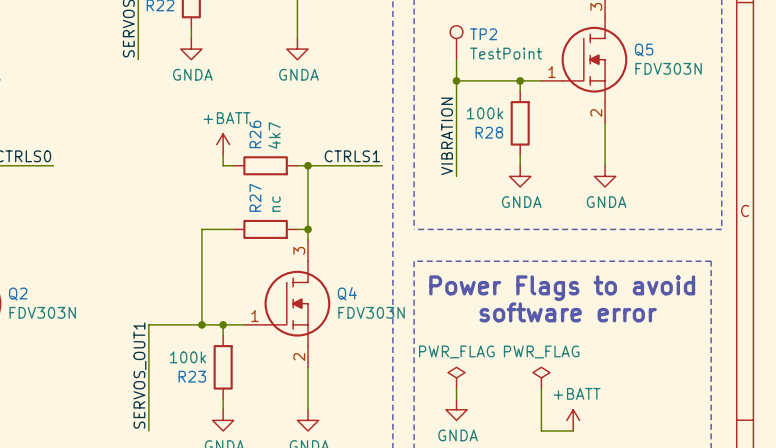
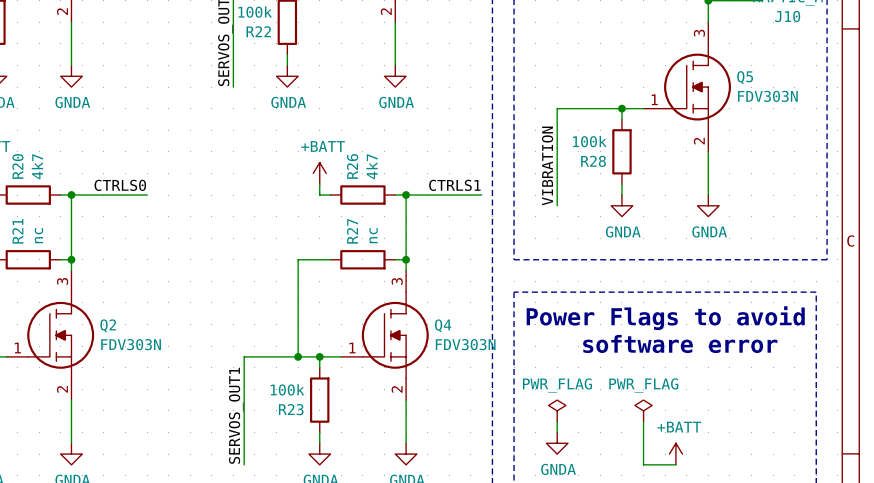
TP2: TestPoint (456, 42) -> none
wire: (456, 59) (456, 80) -> none
junction: (456, 80) -> none

